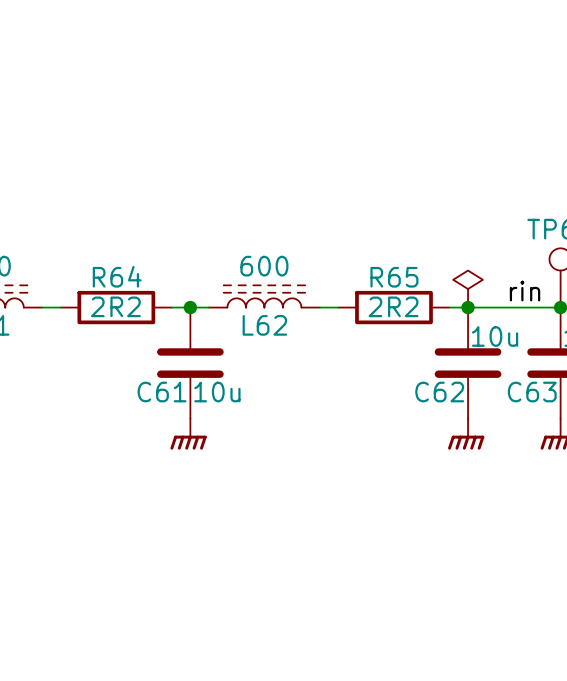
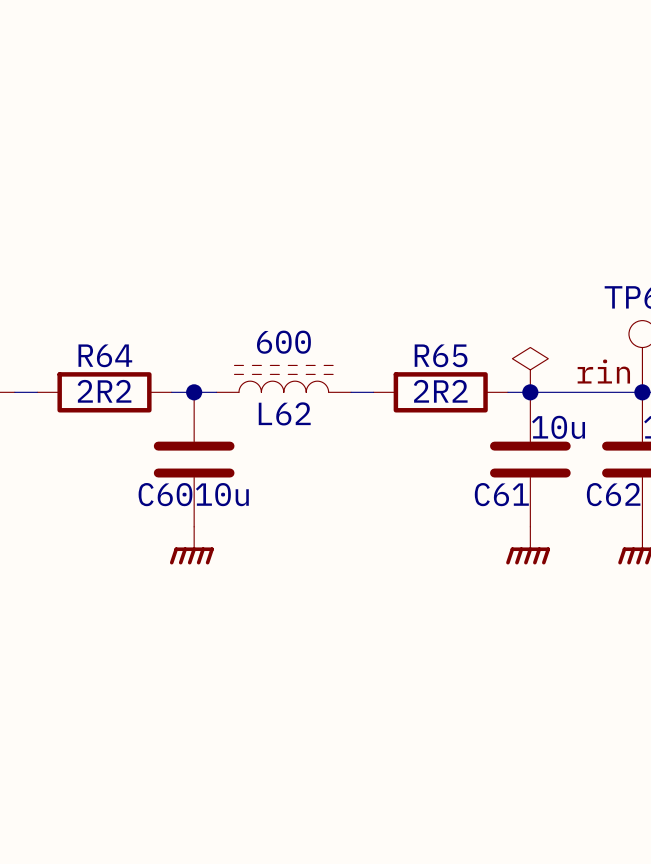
C61 name: C61 (162, 392) -> C60 (165, 494)
C62 name: C62 (439, 392) -> C61 (501, 494)
C63 name: C63 (532, 392) -> C62 (613, 494)

